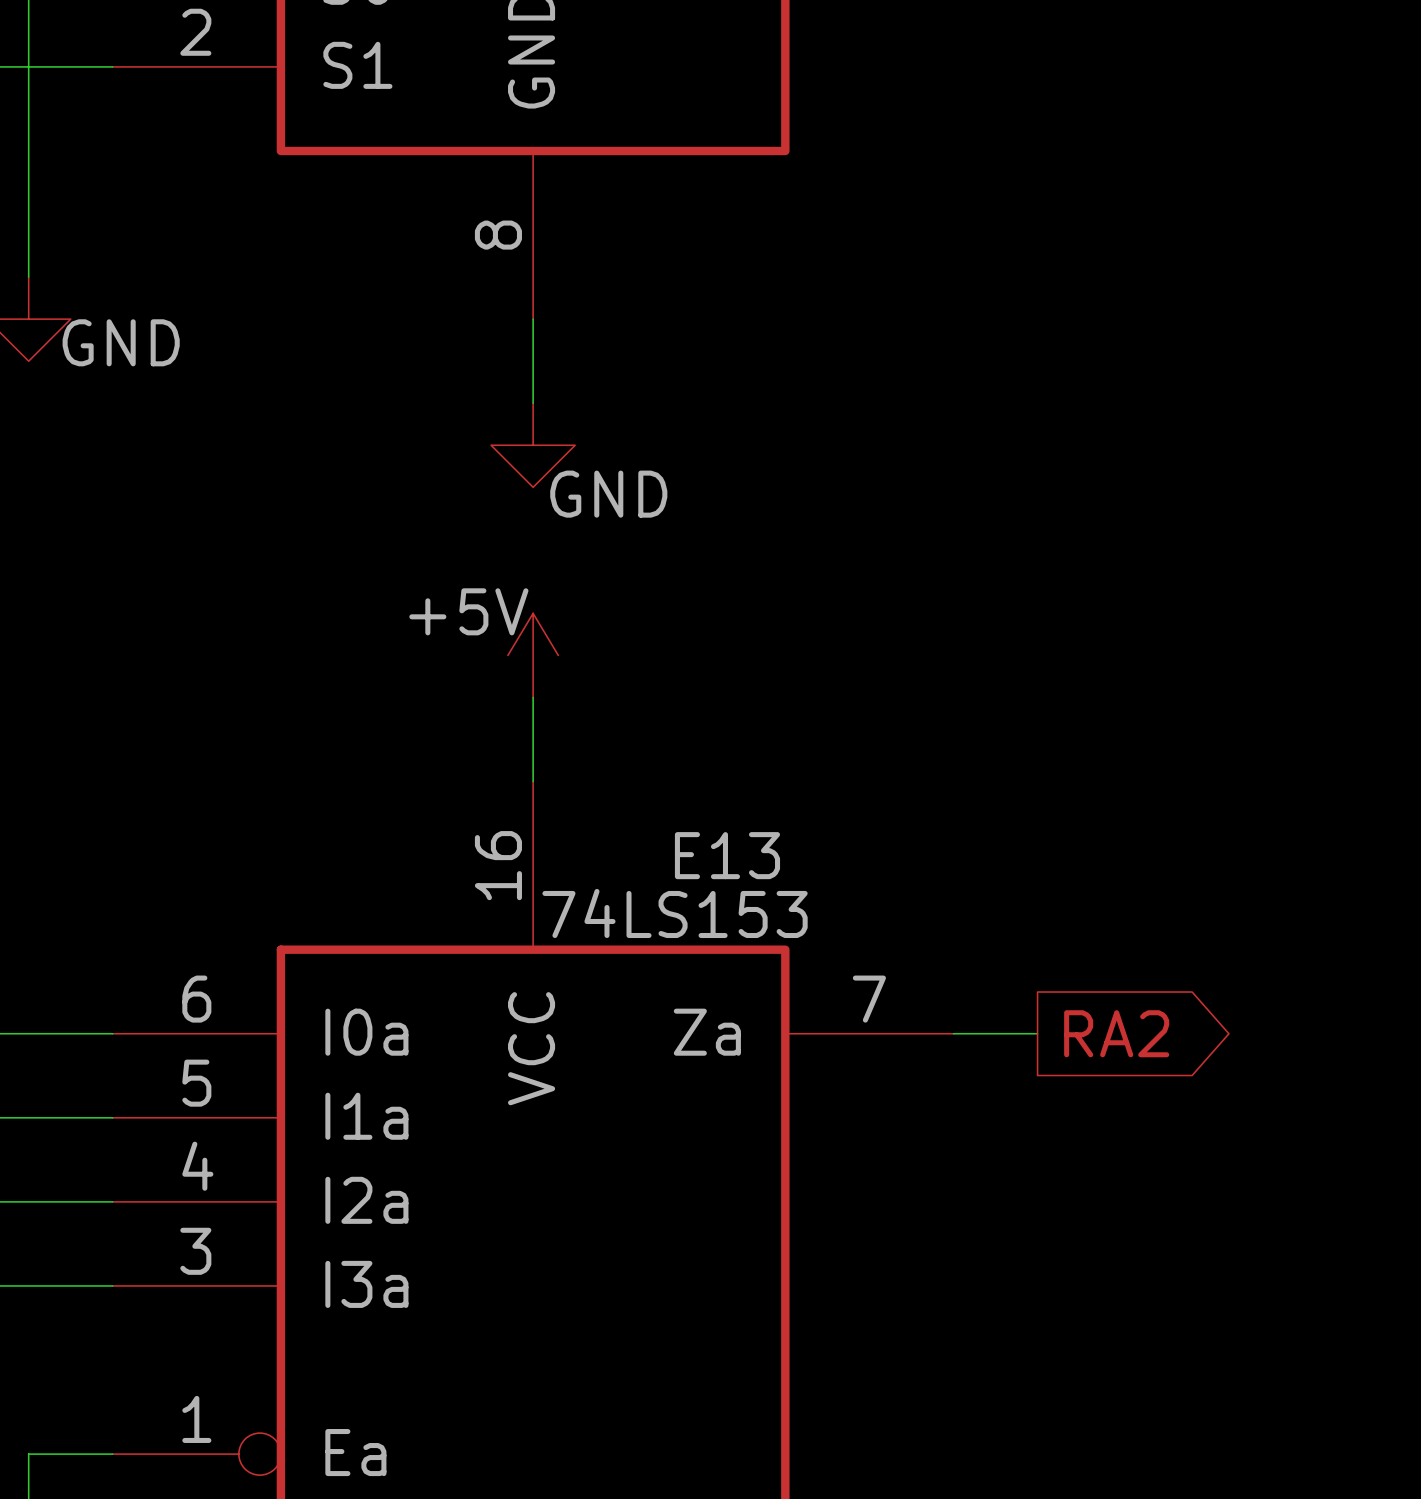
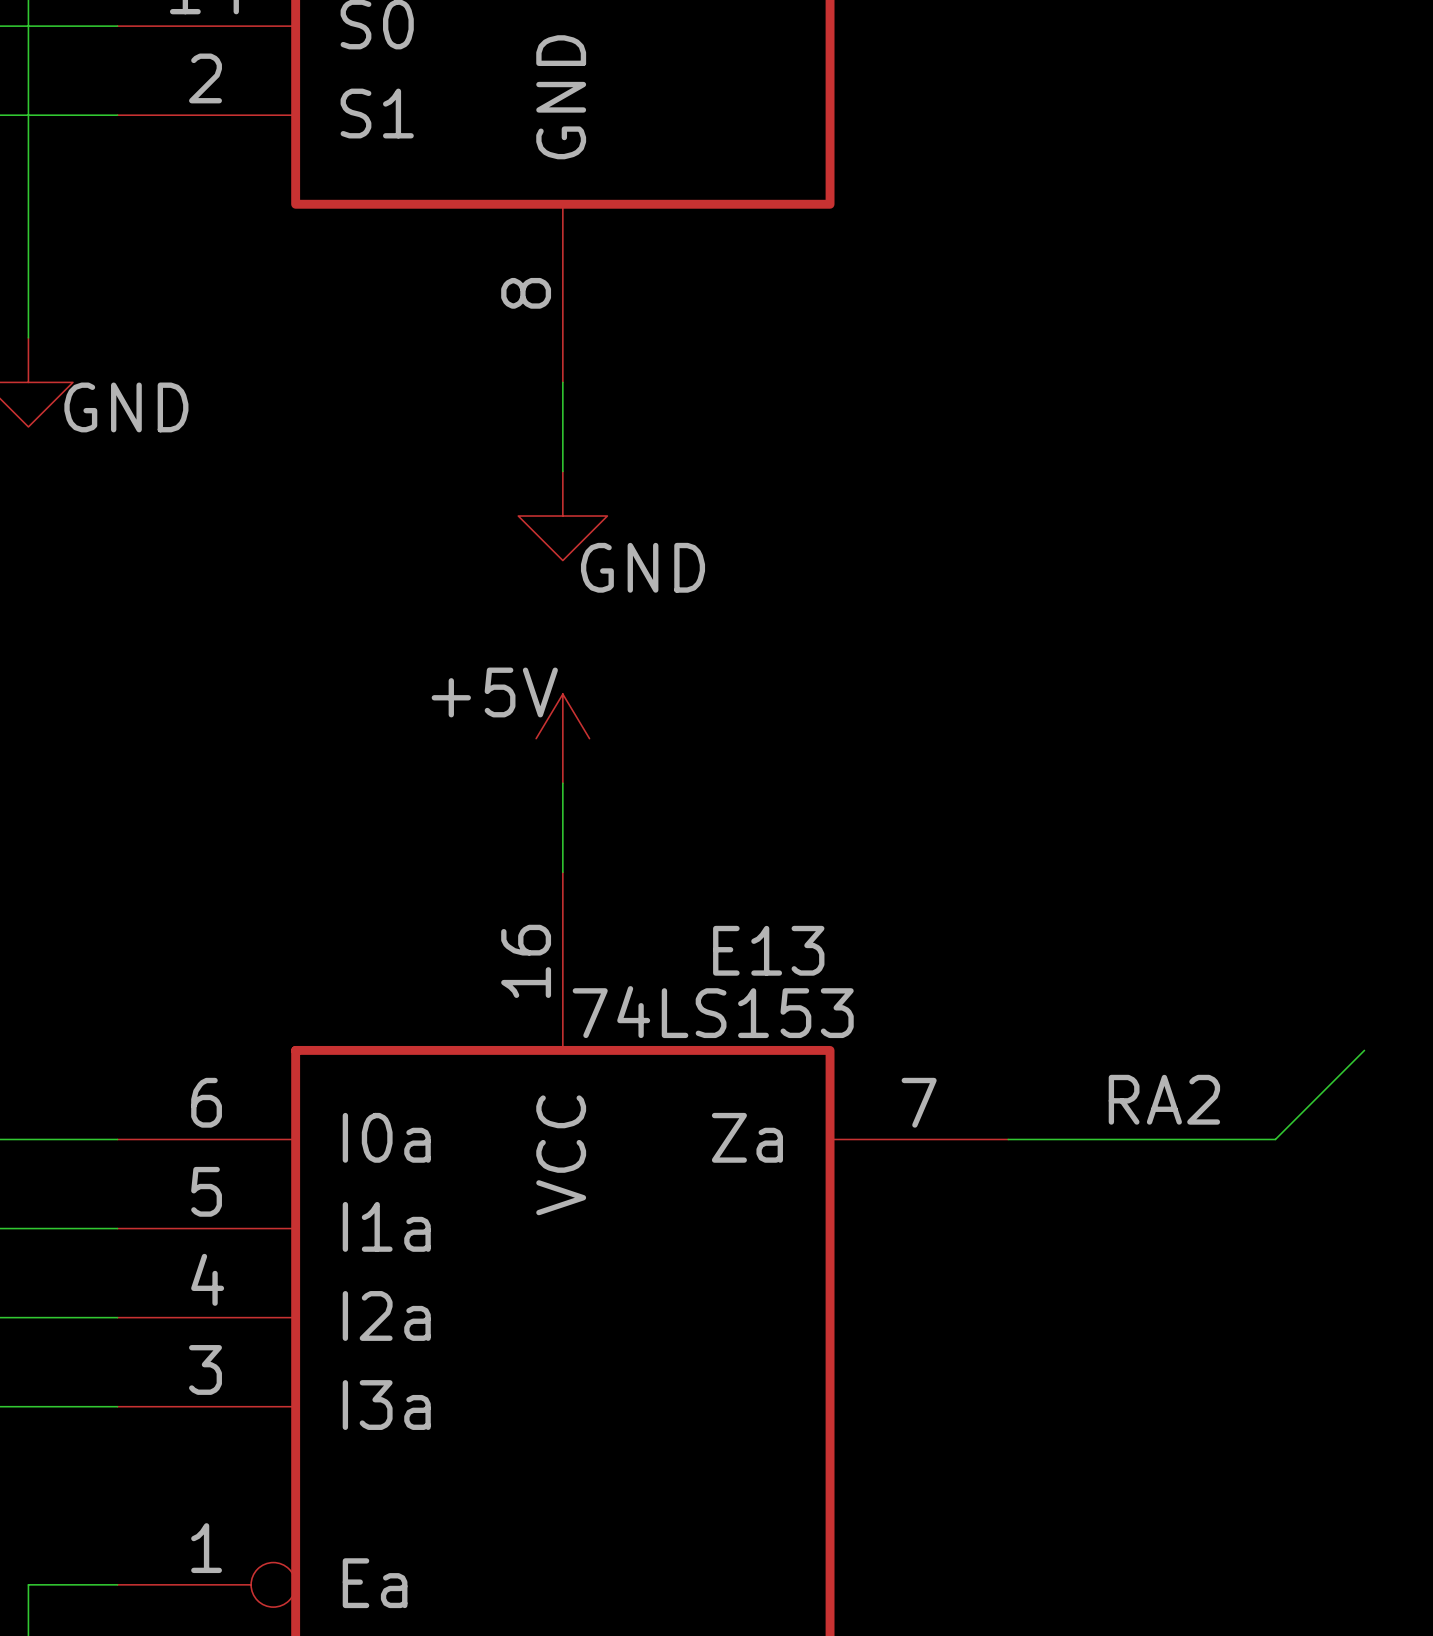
wire: none -> (1364, 1050) (1275, 1139) (1097, 1139)
label: none -> RA2 (1164, 1099)
global label: RA2 (1116, 1033) -> none

